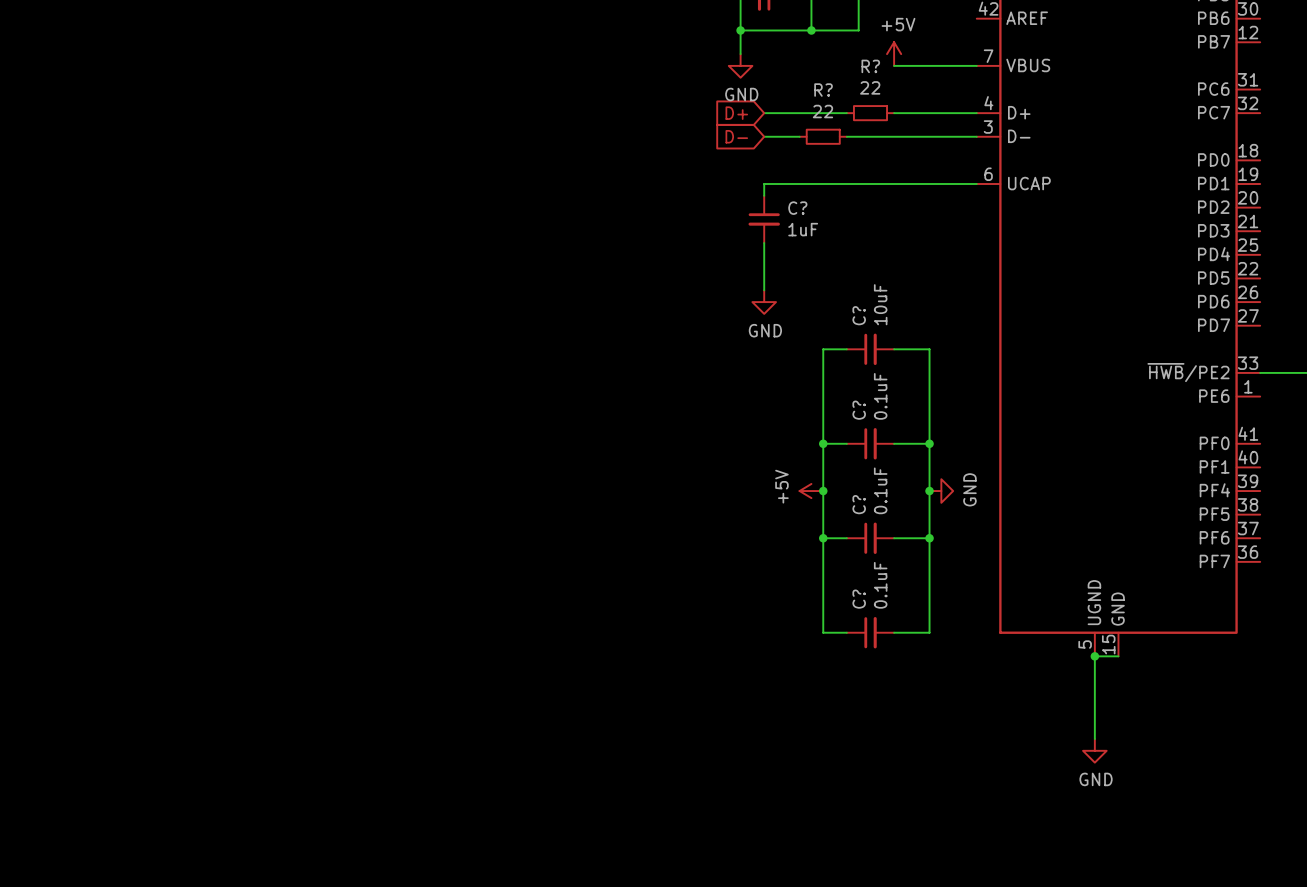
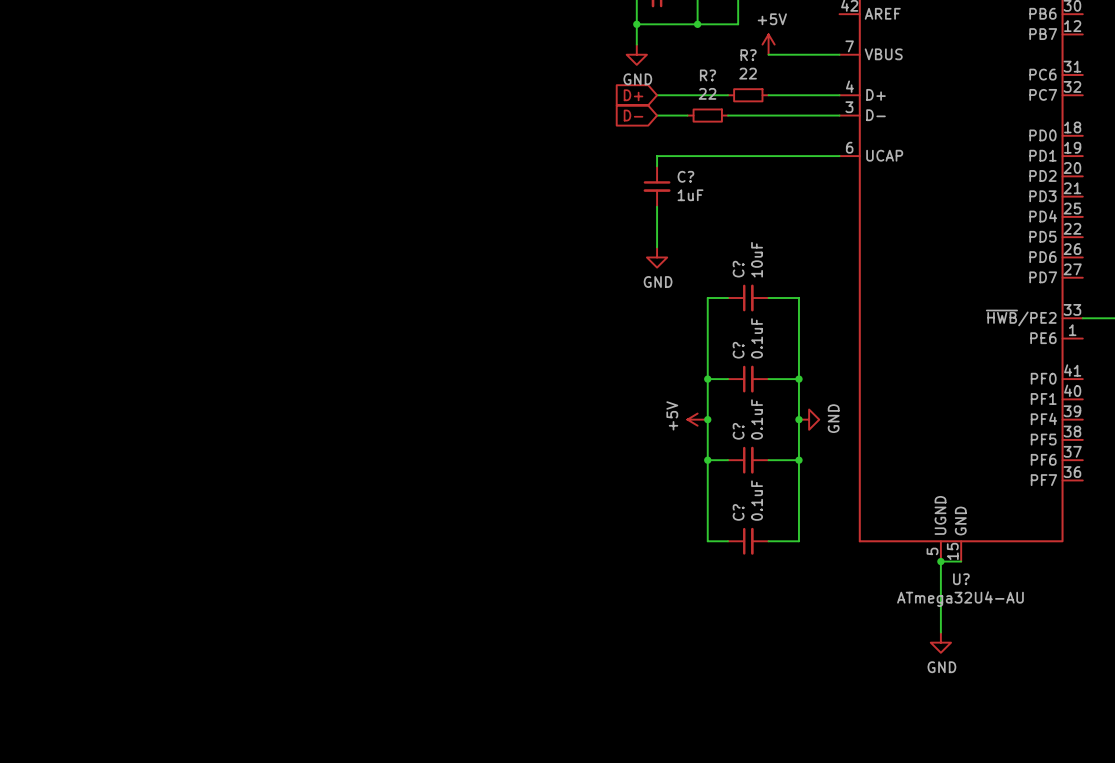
U? name: none -> U? (961, 579)
U? value: none -> ATmega32U4-AU (960, 599)

